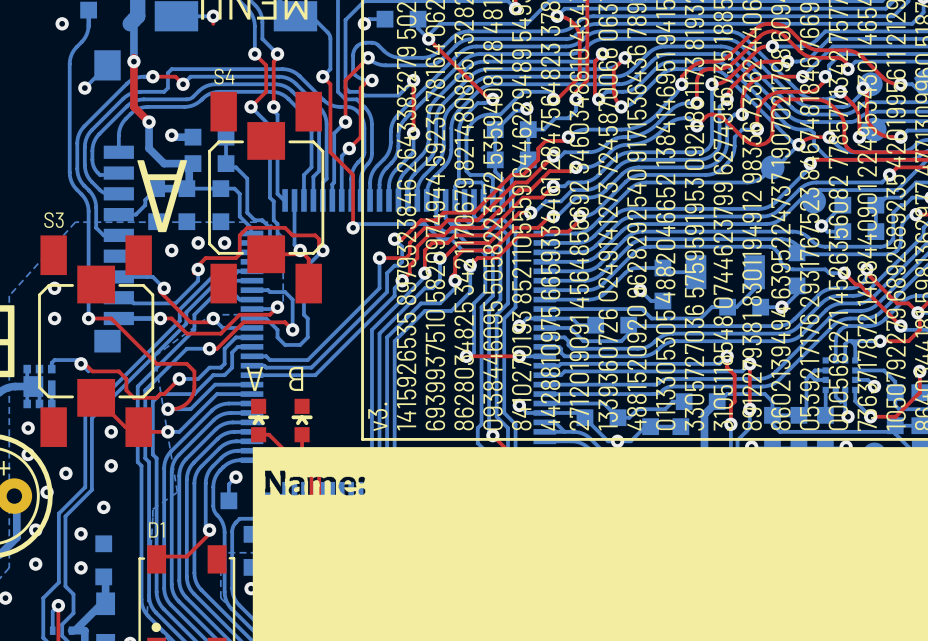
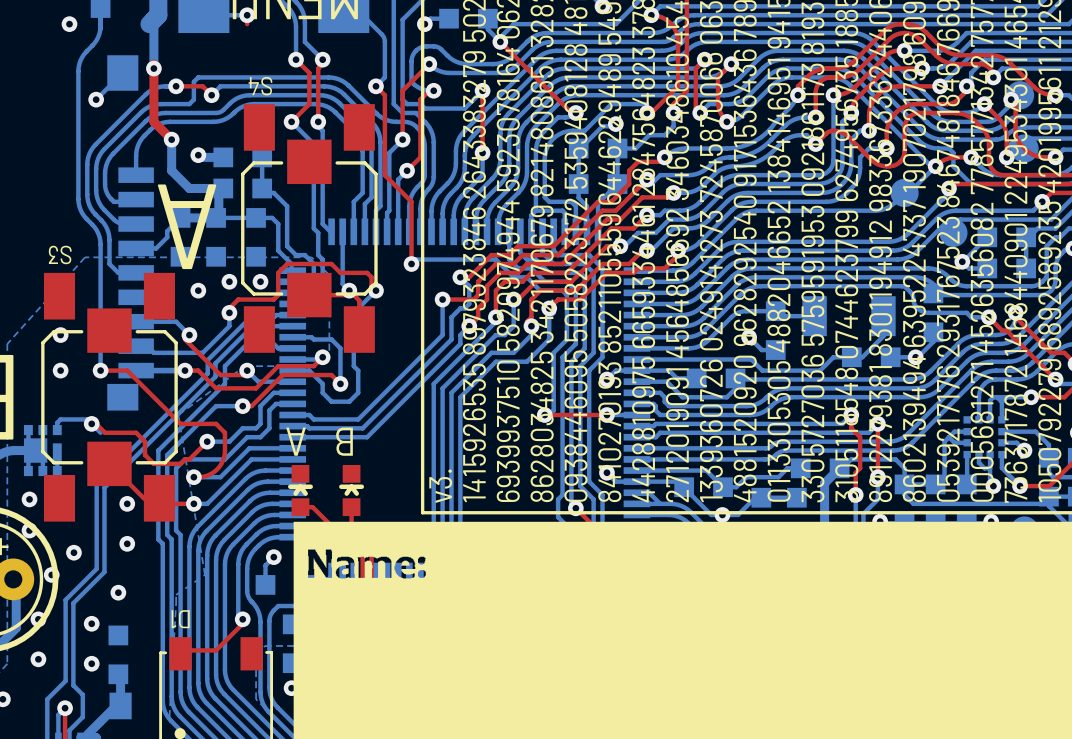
S4 name rotation: 0° (224, 76) -> 180° (260, 86)
S3 name rotation: 0° (53, 220) -> 180° (60, 254)
D1 name rotation: 0° (156, 529) -> 180° (180, 619)

